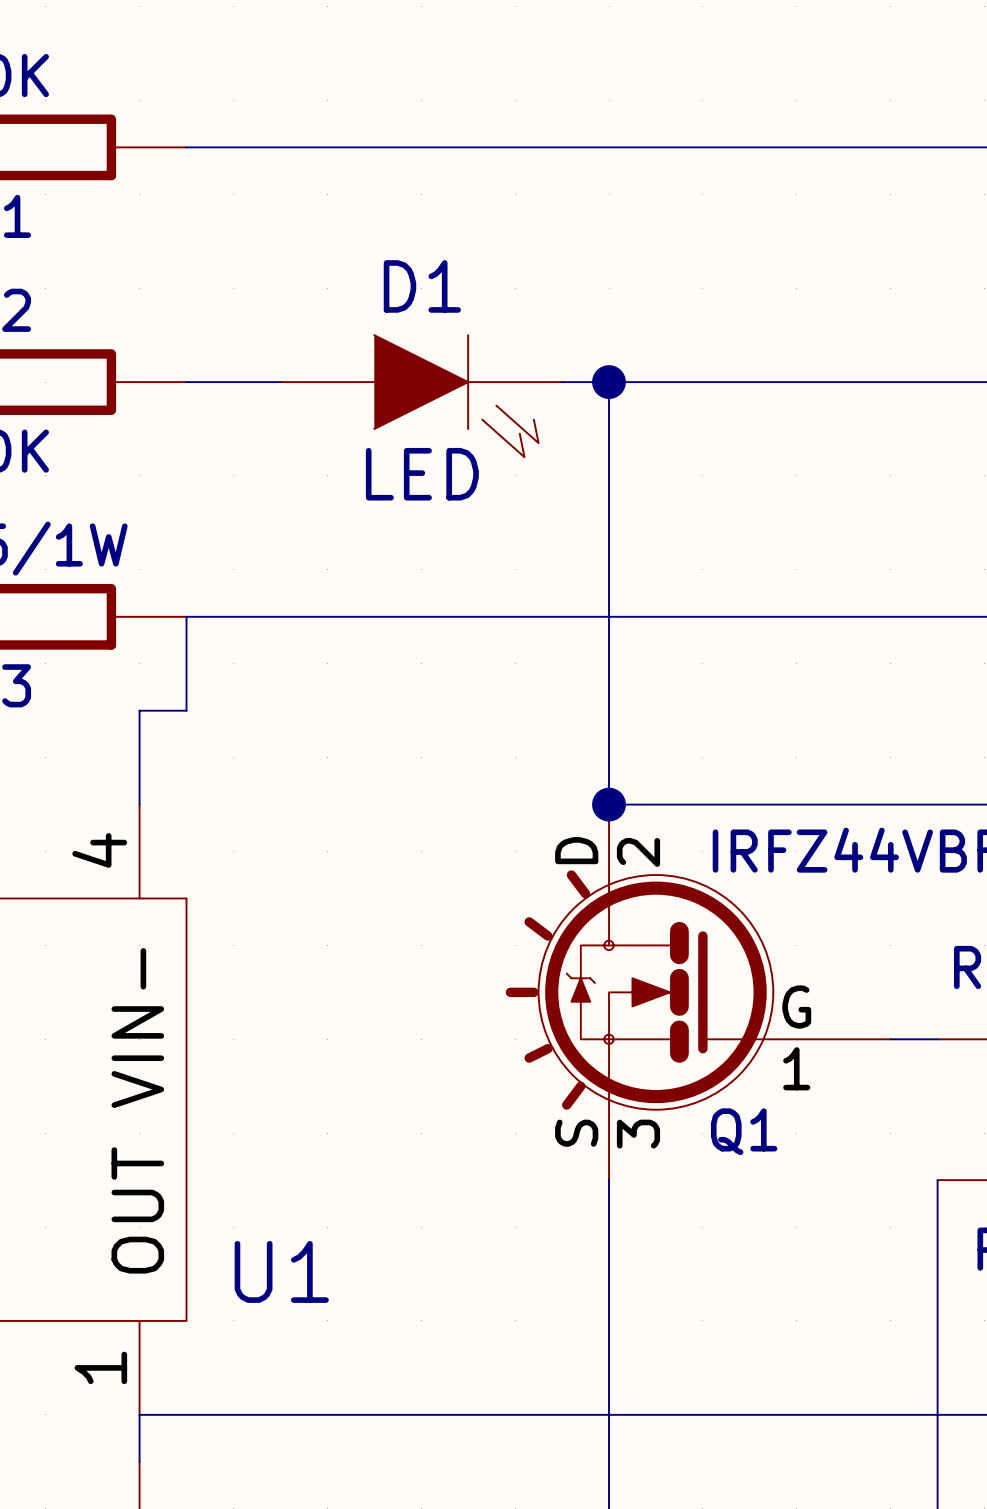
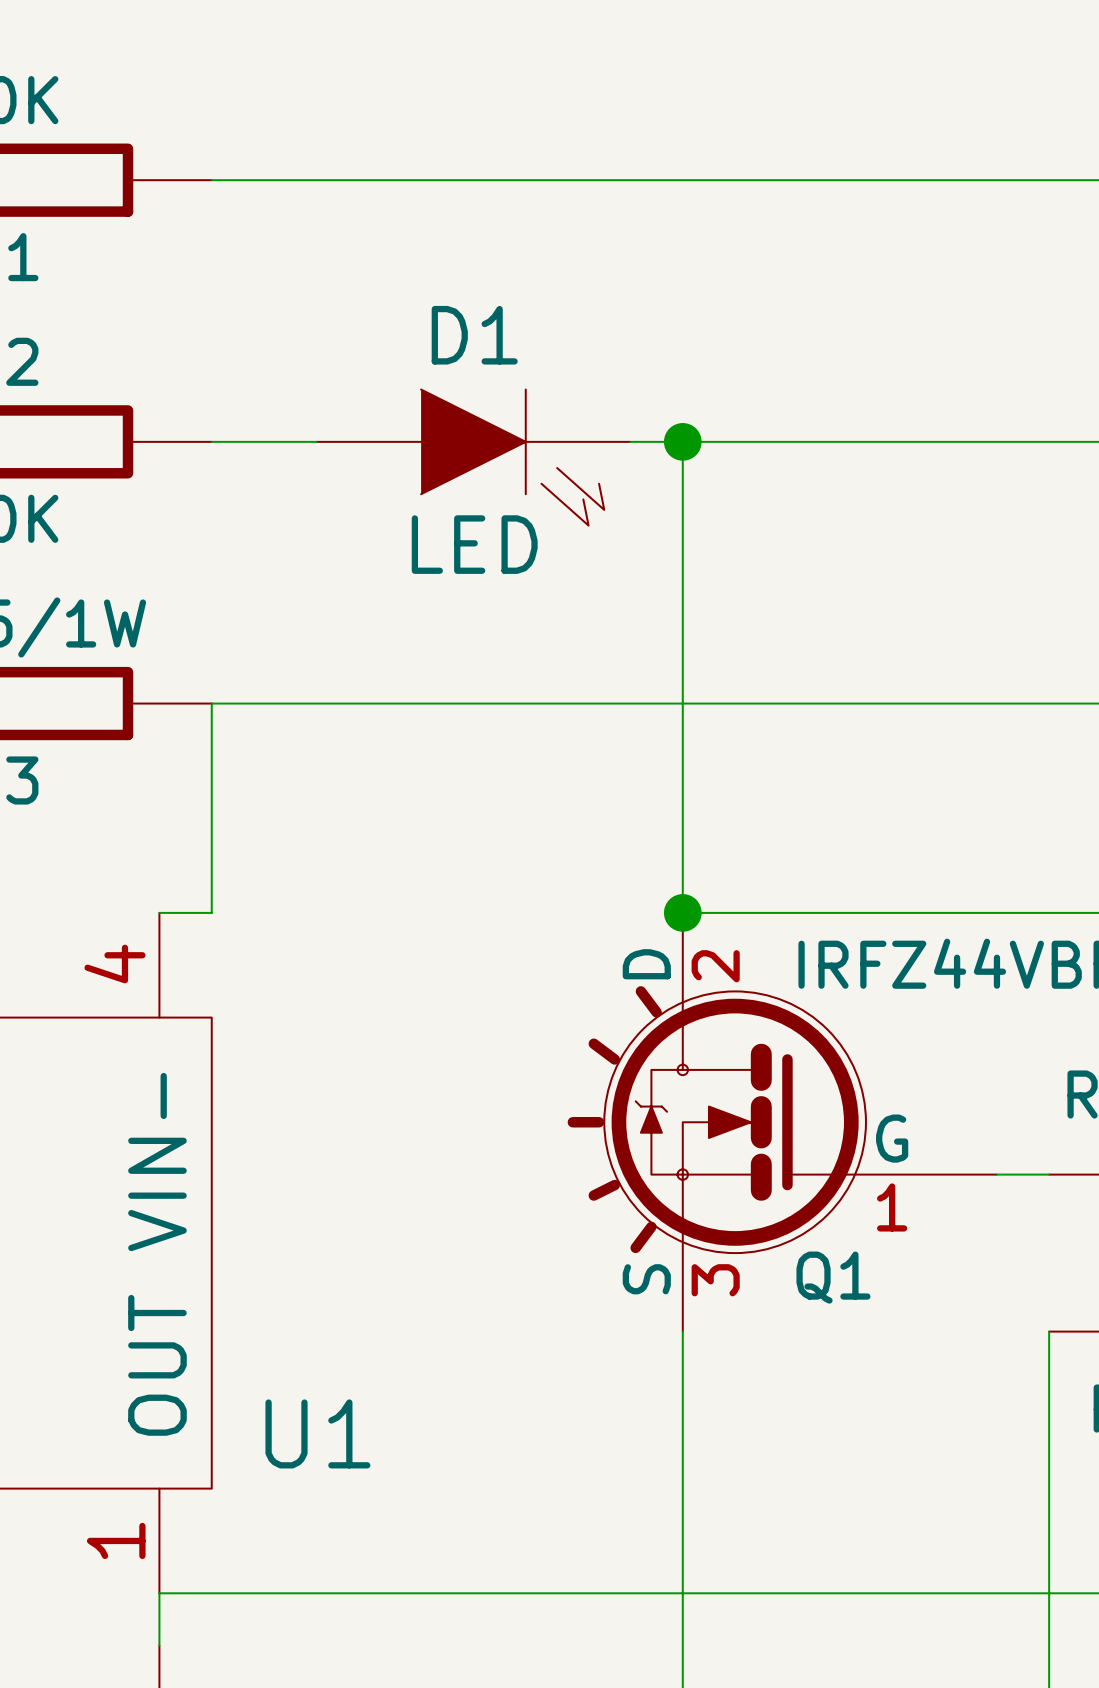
wire: (186, 710) (139, 710) (139, 804) -> (211, 808) (211, 912) (159, 912)

